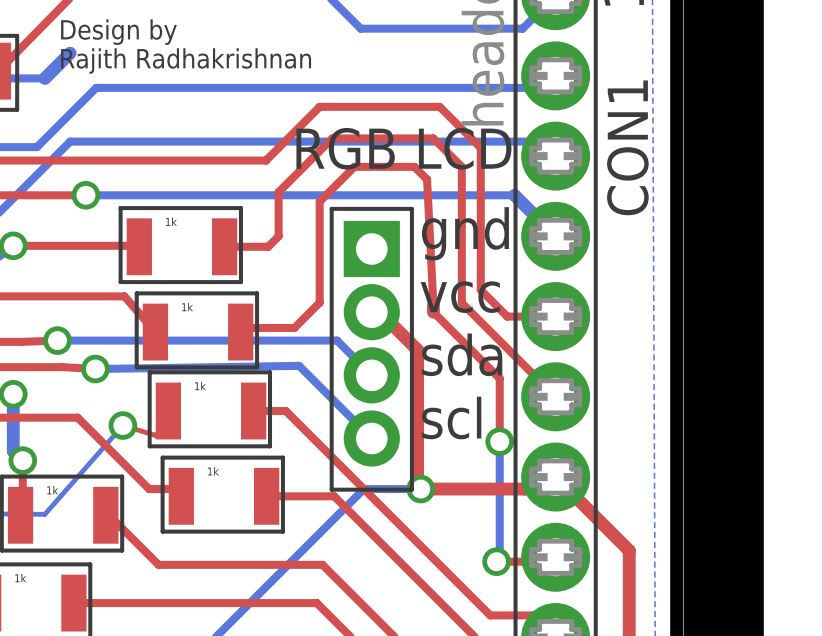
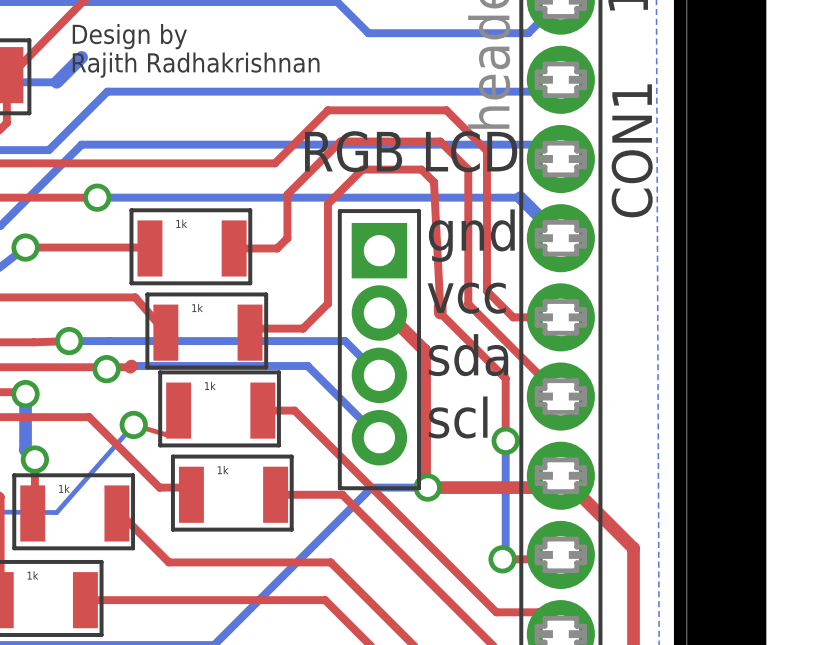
bottom track: (299, 365) (95, 369) -> (307, 366) (131, 366)
top track: (62, 367) (95, 369) -> (74, 367) (131, 366)

